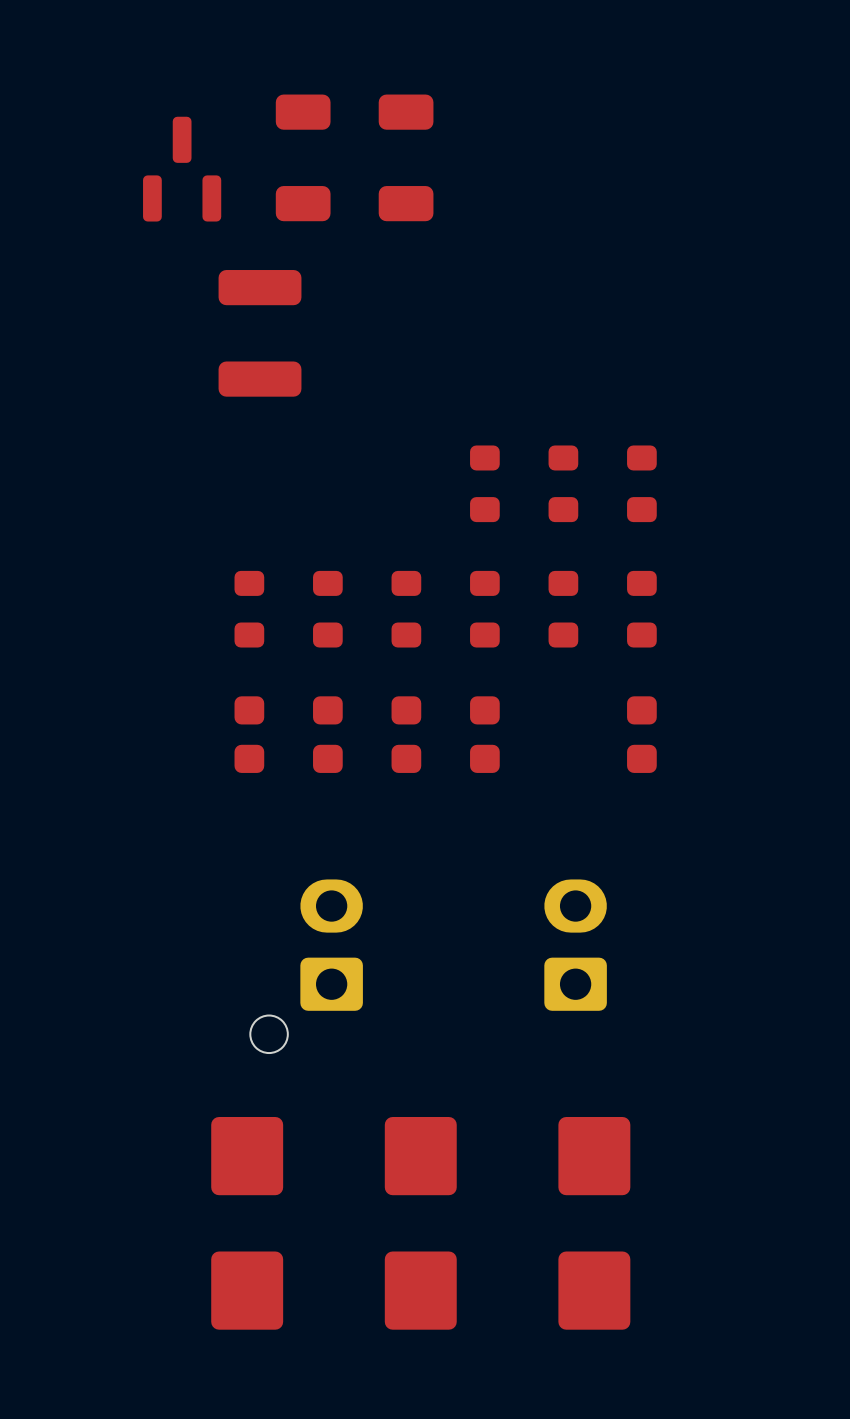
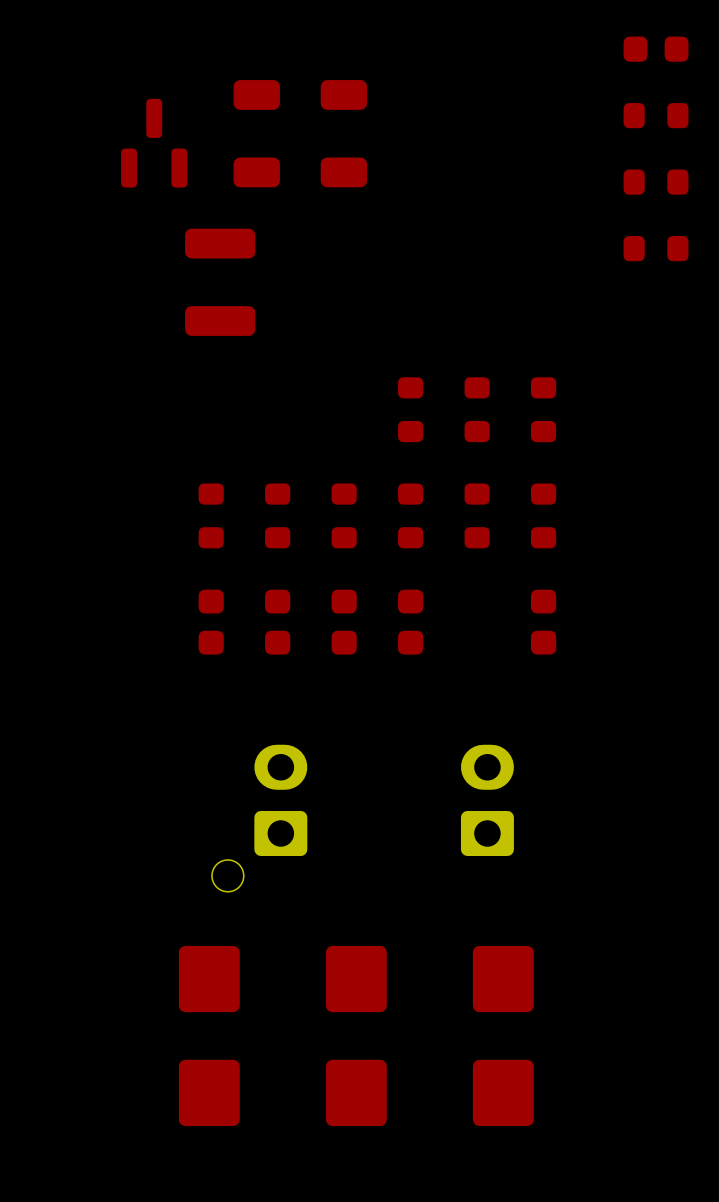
part: none -> (656, 49)
part: none -> (656, 115)
part: none -> (656, 182)
part: none -> (656, 248)

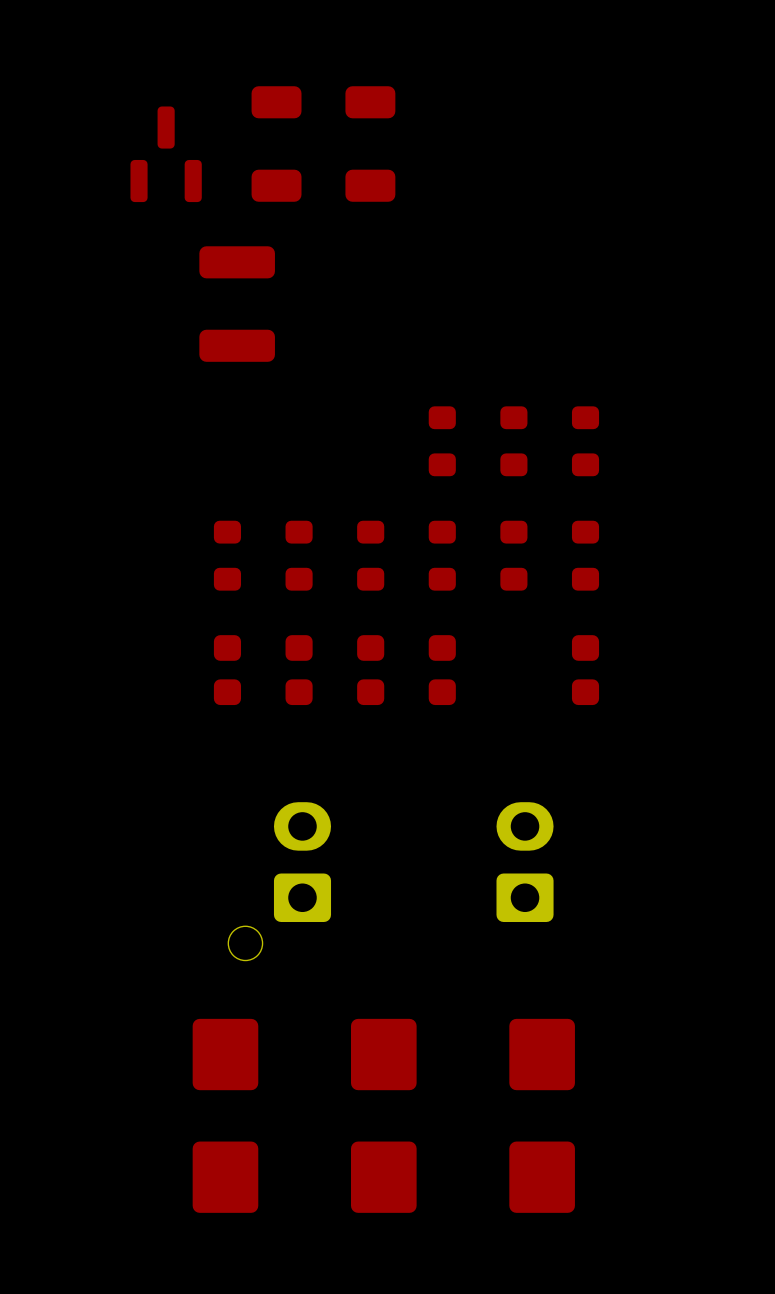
part: (656, 49) -> none
part: (656, 115) -> none
part: (656, 182) -> none
part: (656, 248) -> none

